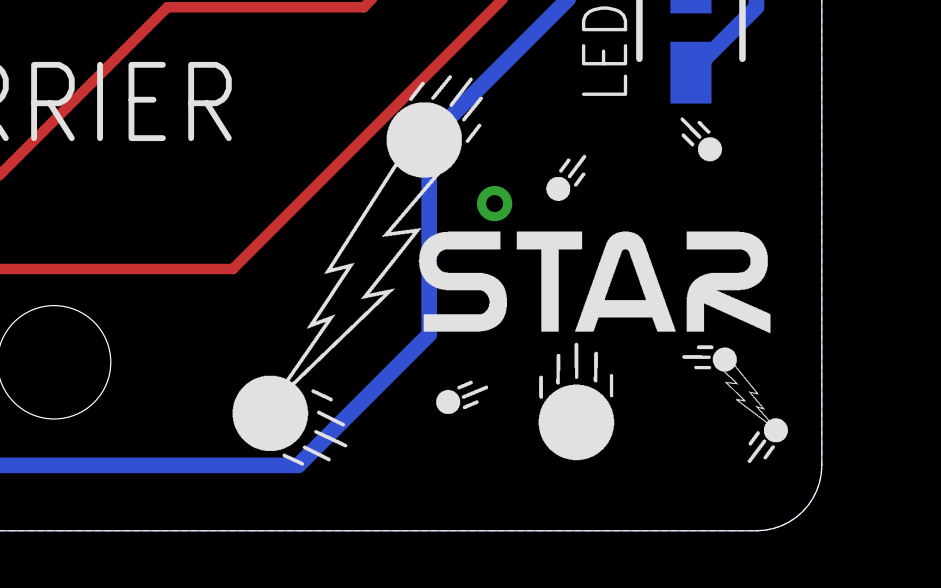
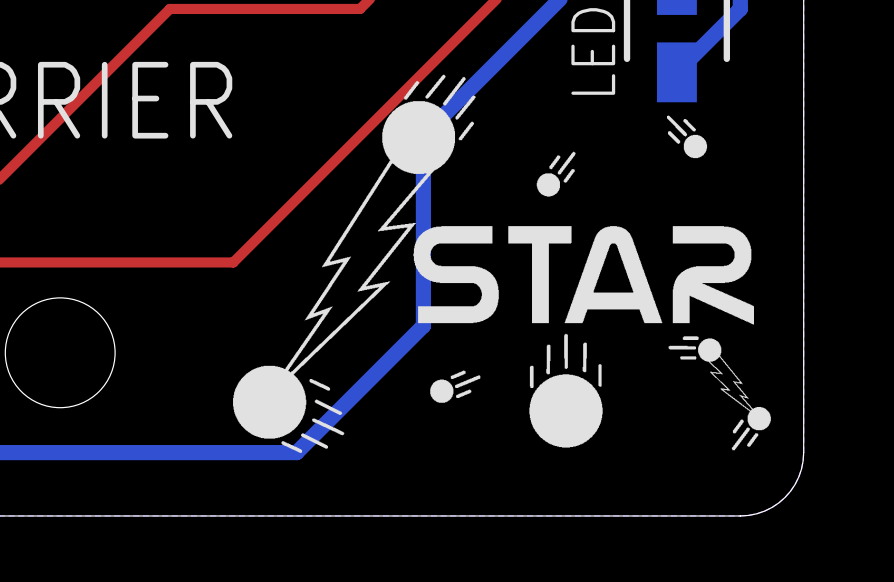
via: (494, 203) -> none

